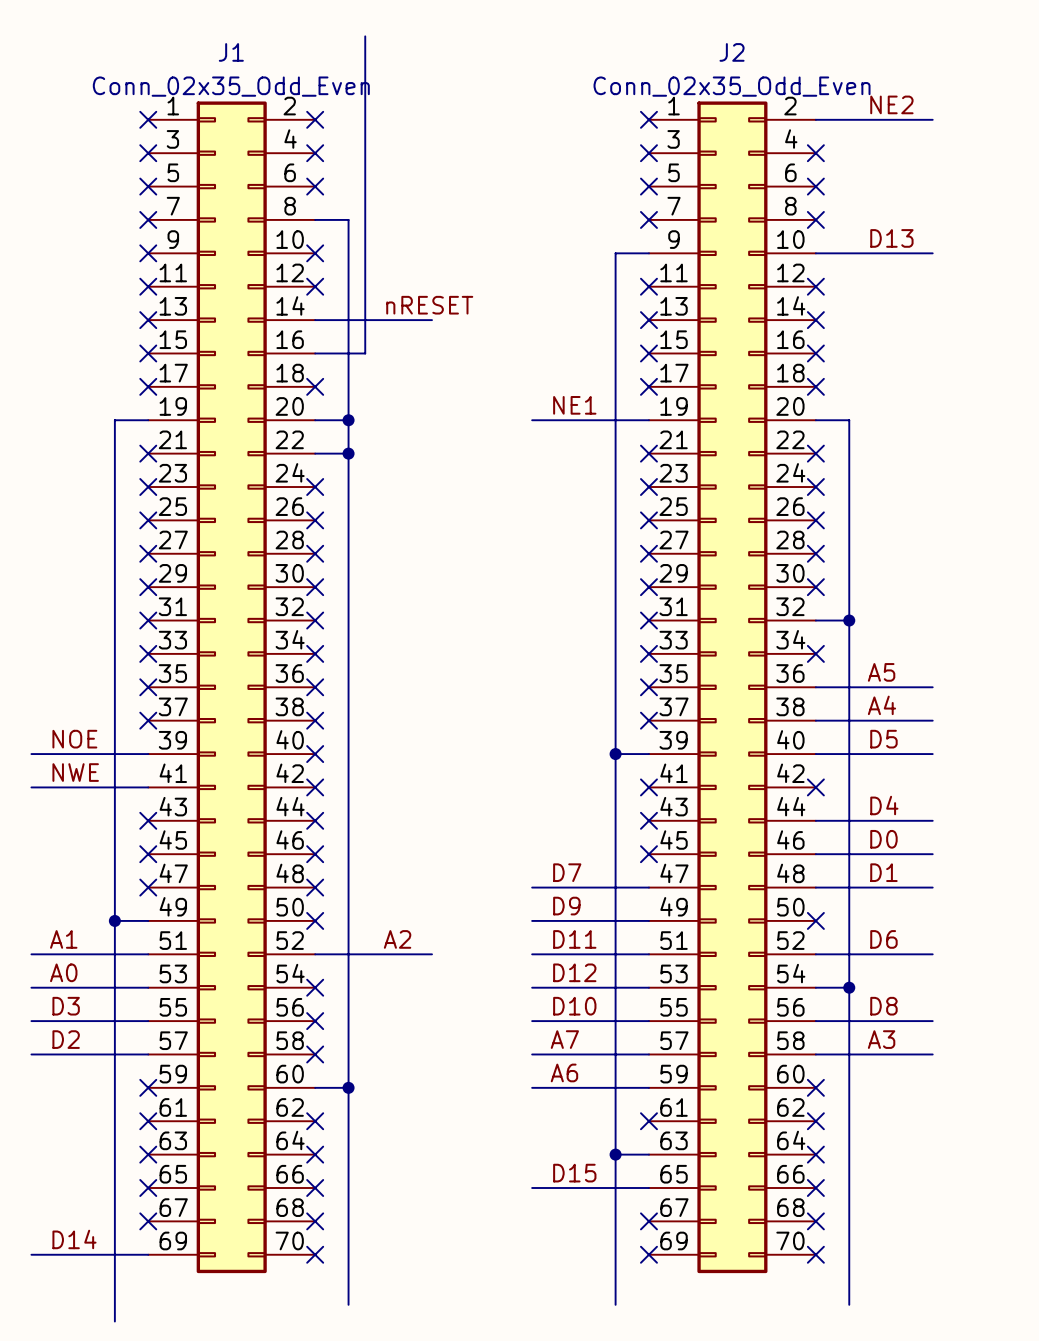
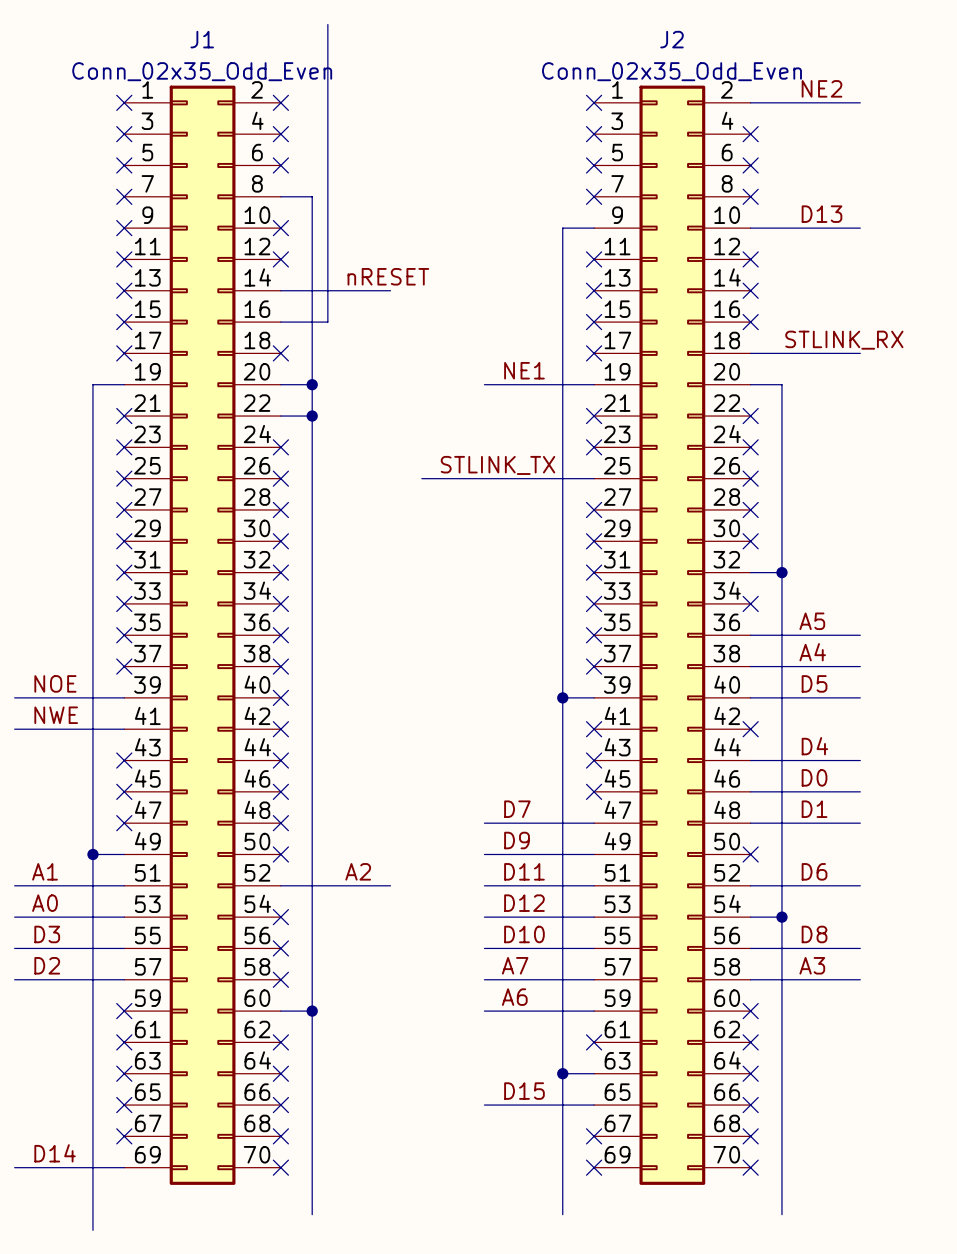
label: none -> STLINK_RX (844, 340)
wire: none -> (750, 353) (860, 353)
no-connect mark: (815, 386) -> none
label: none -> STLINK_TX (497, 465)
wire: none -> (421, 478) (594, 478)
no-connect mark: (648, 520) -> none

